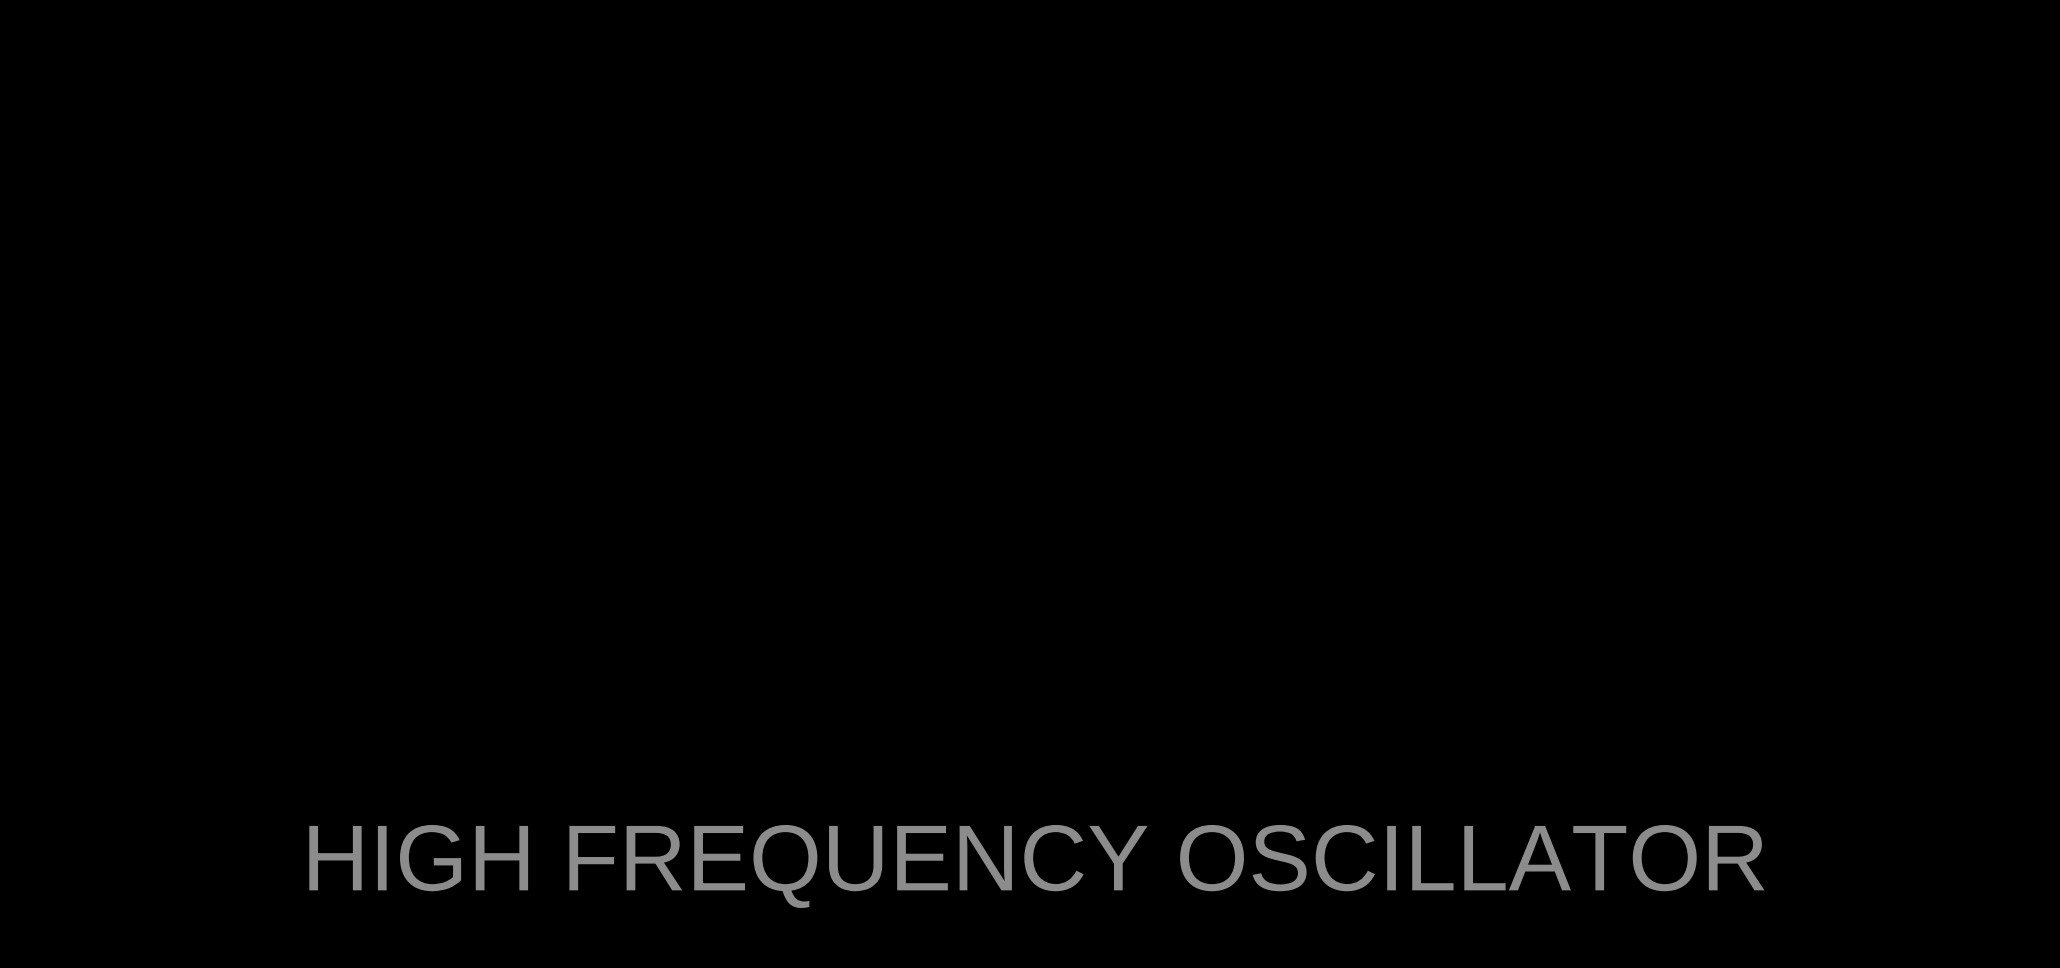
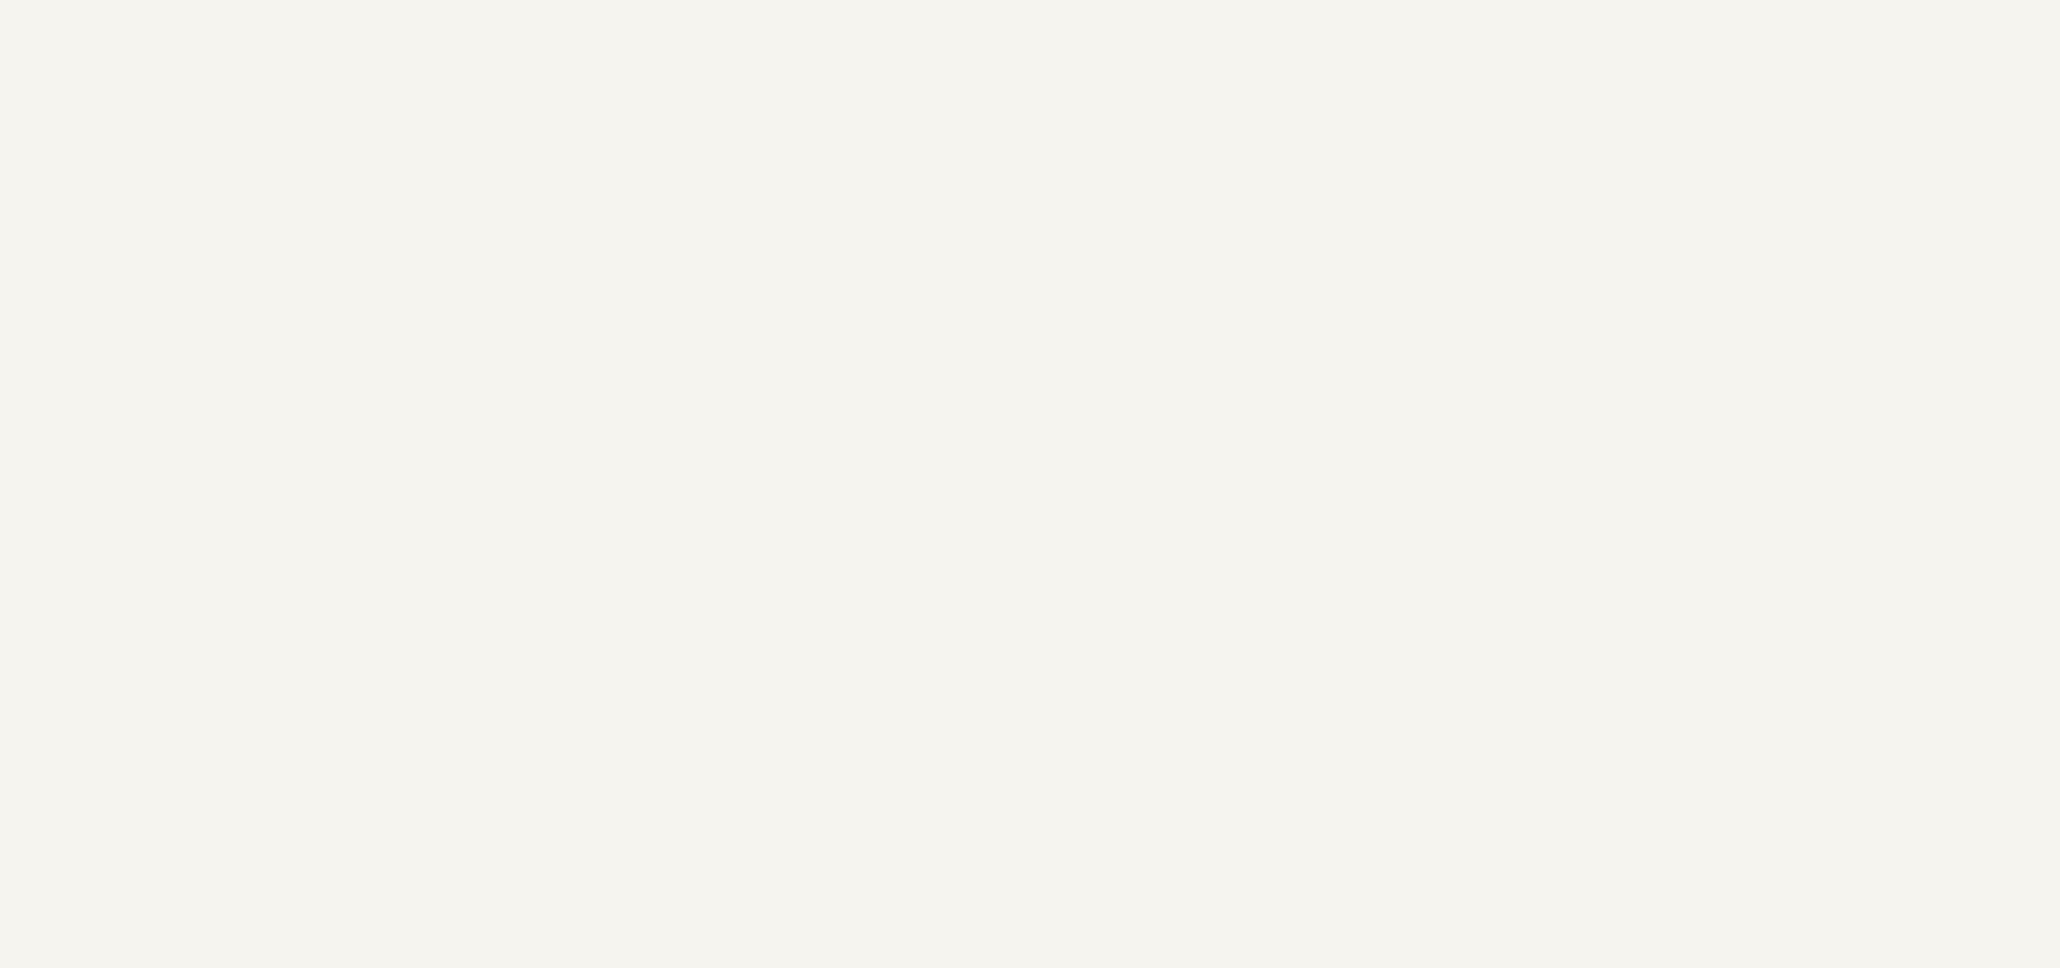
text: HIGH FREQUENCY OSCILLATOR (1036, 866) -> none

